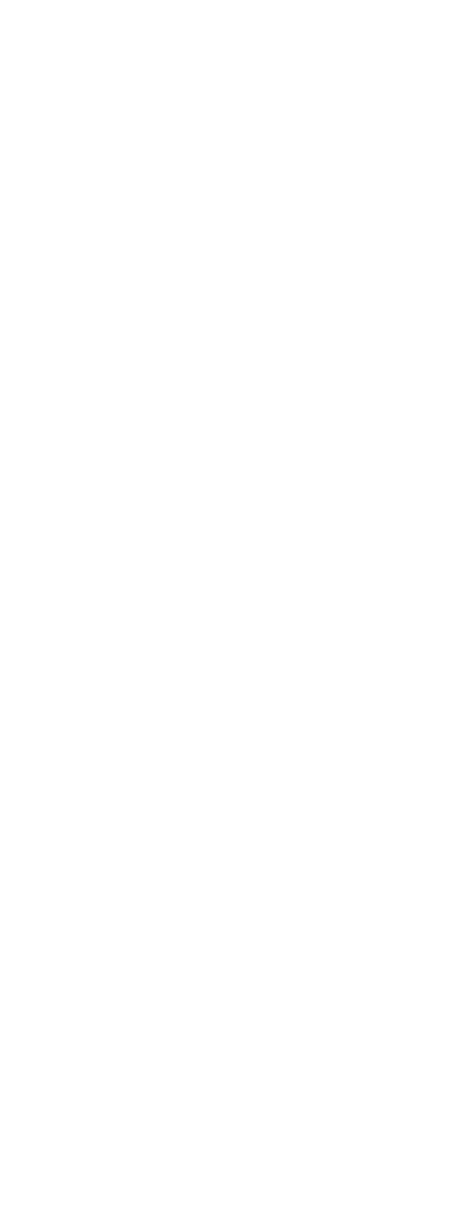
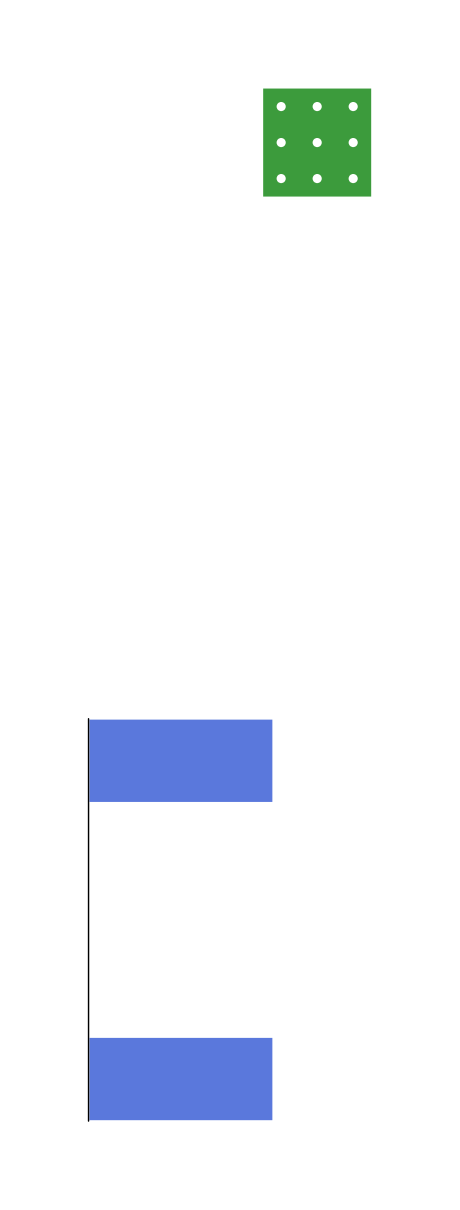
part: none -> (317, 142)
part: none -> (180, 919)

